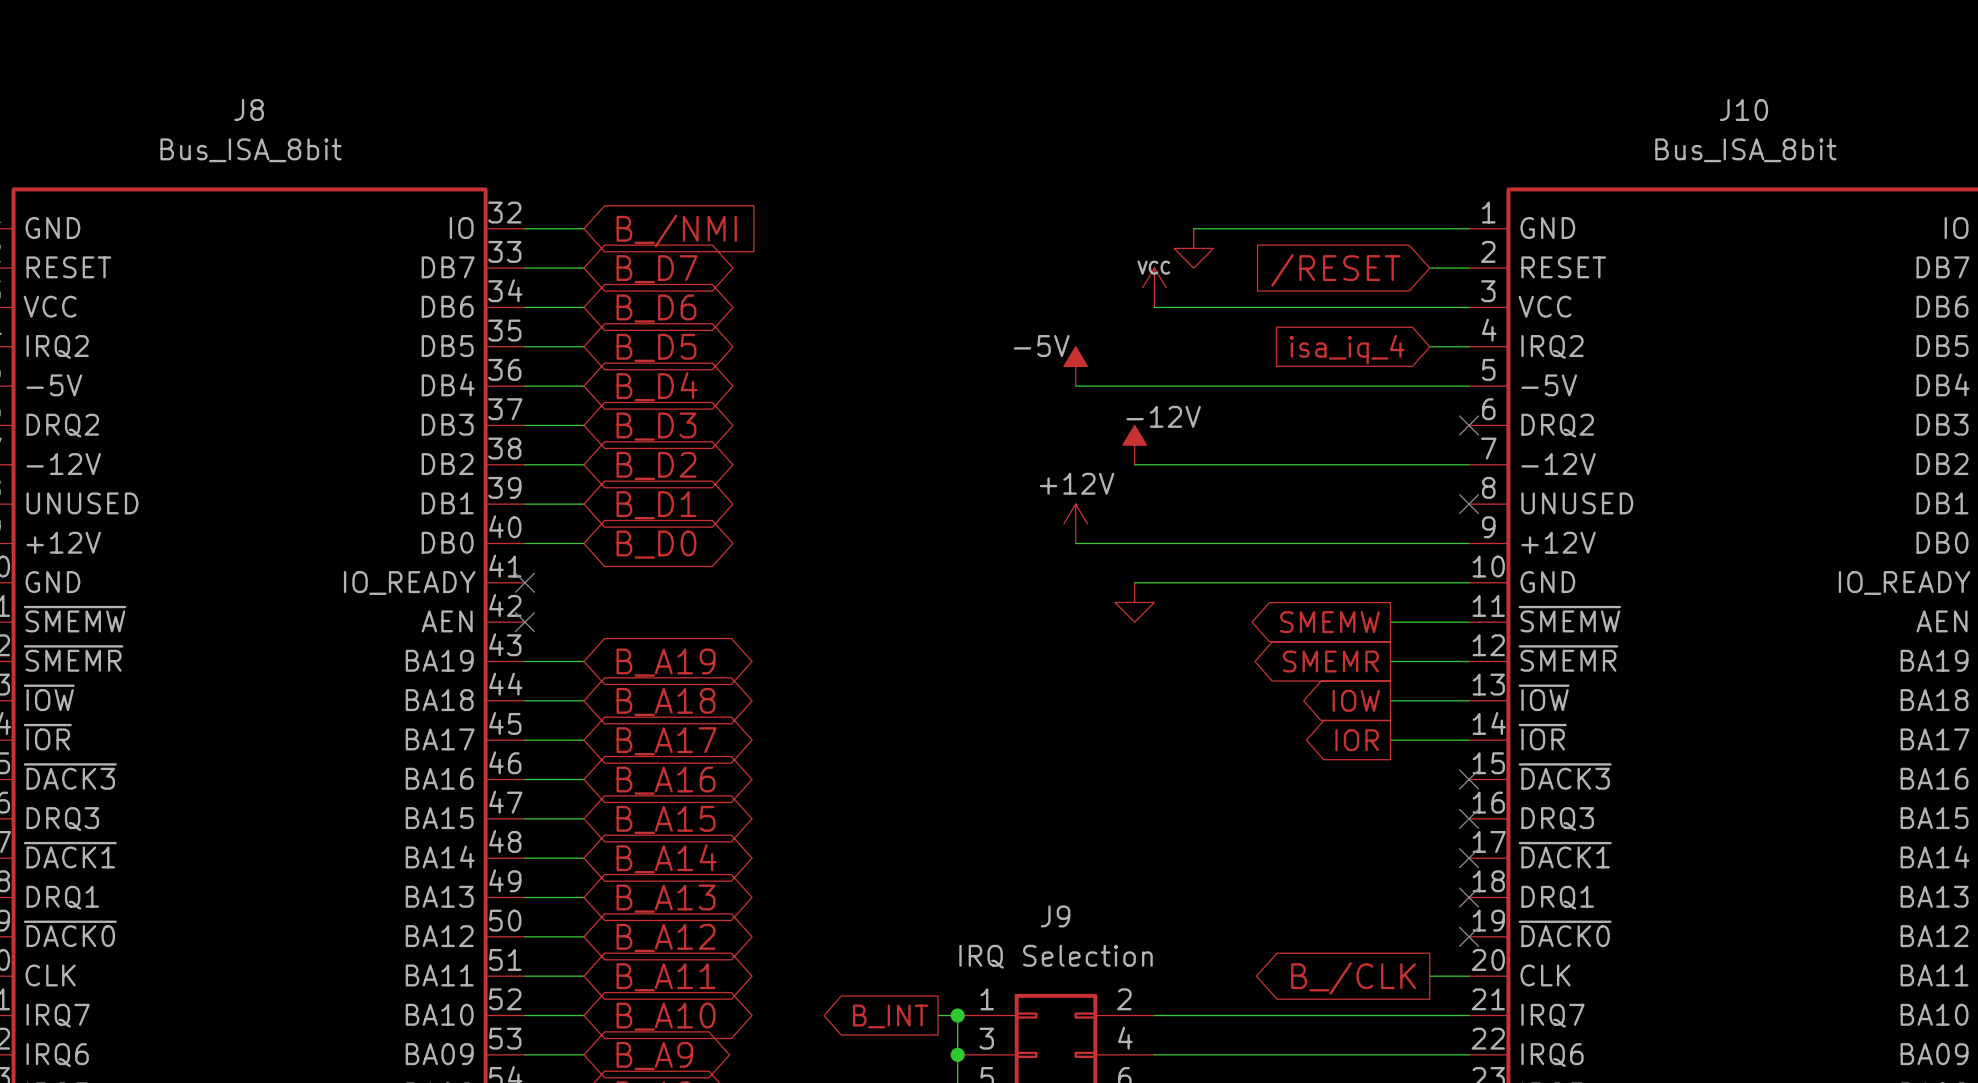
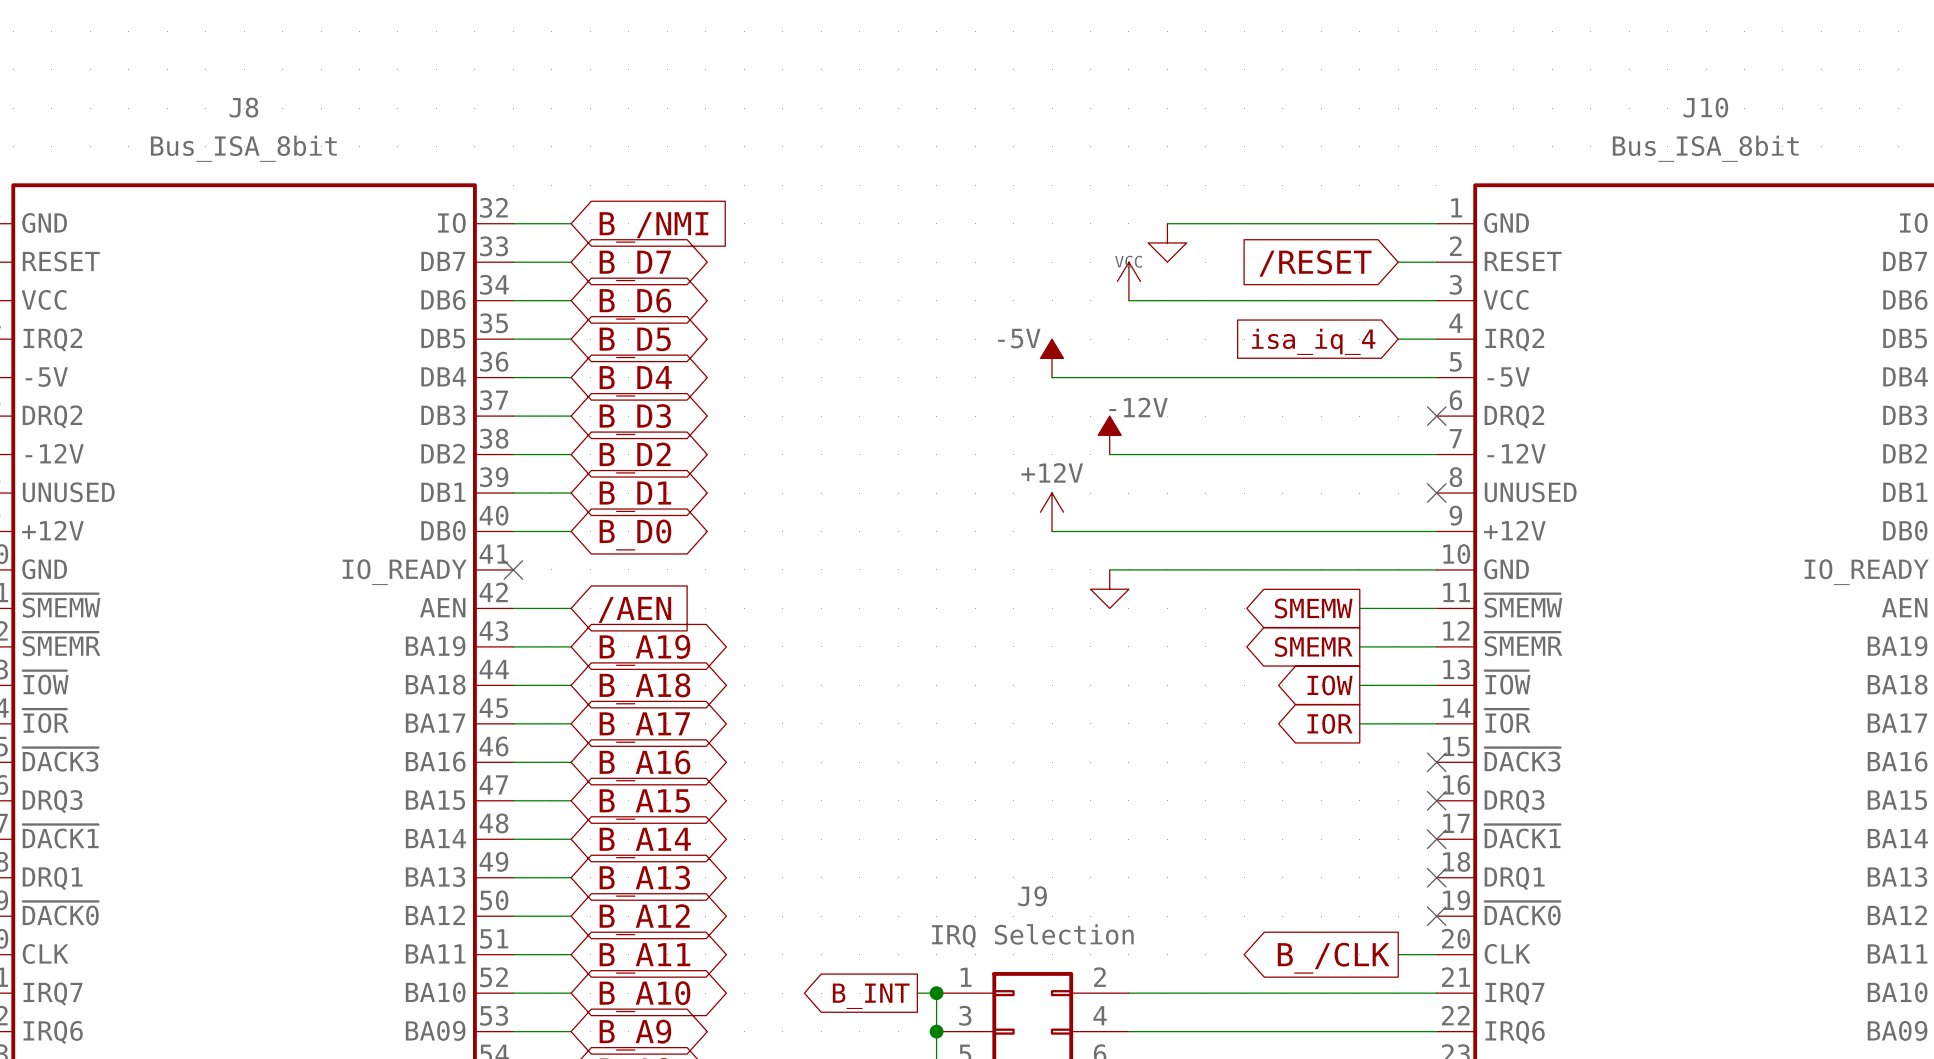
wire: none -> (513, 608) (571, 608)
no-connect mark: (524, 622) -> none
global label: none -> /AEN (634, 609)

